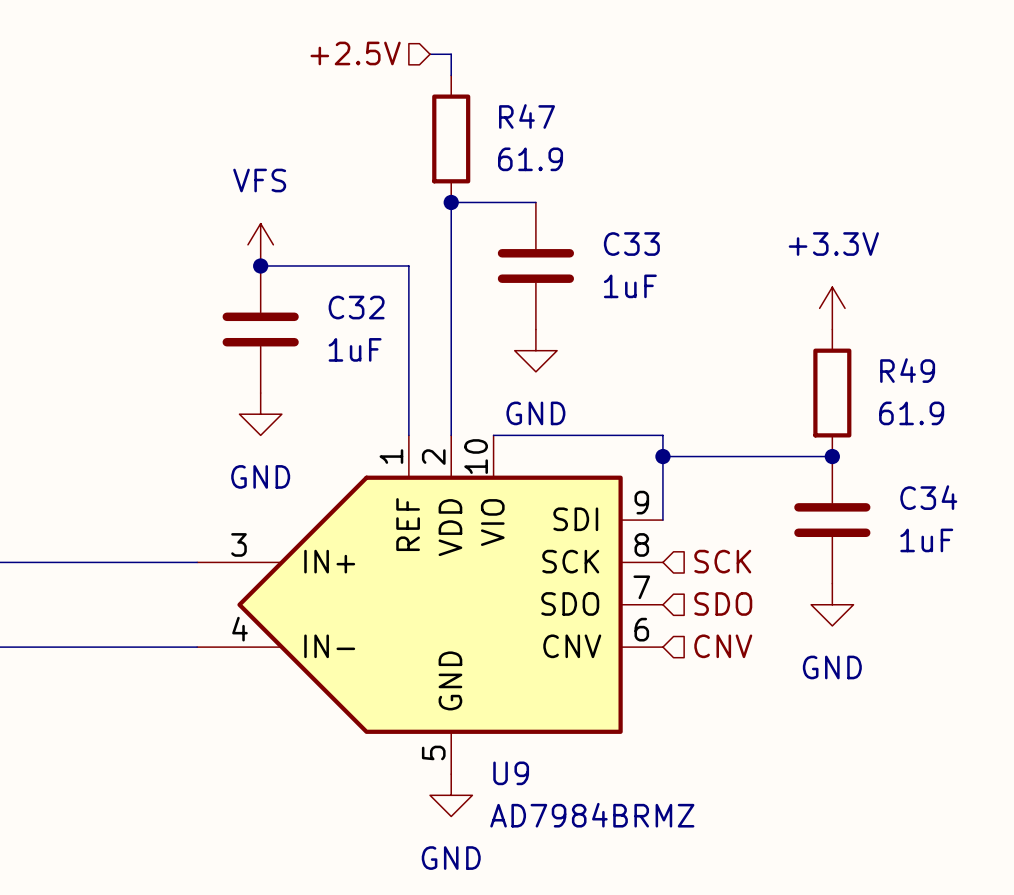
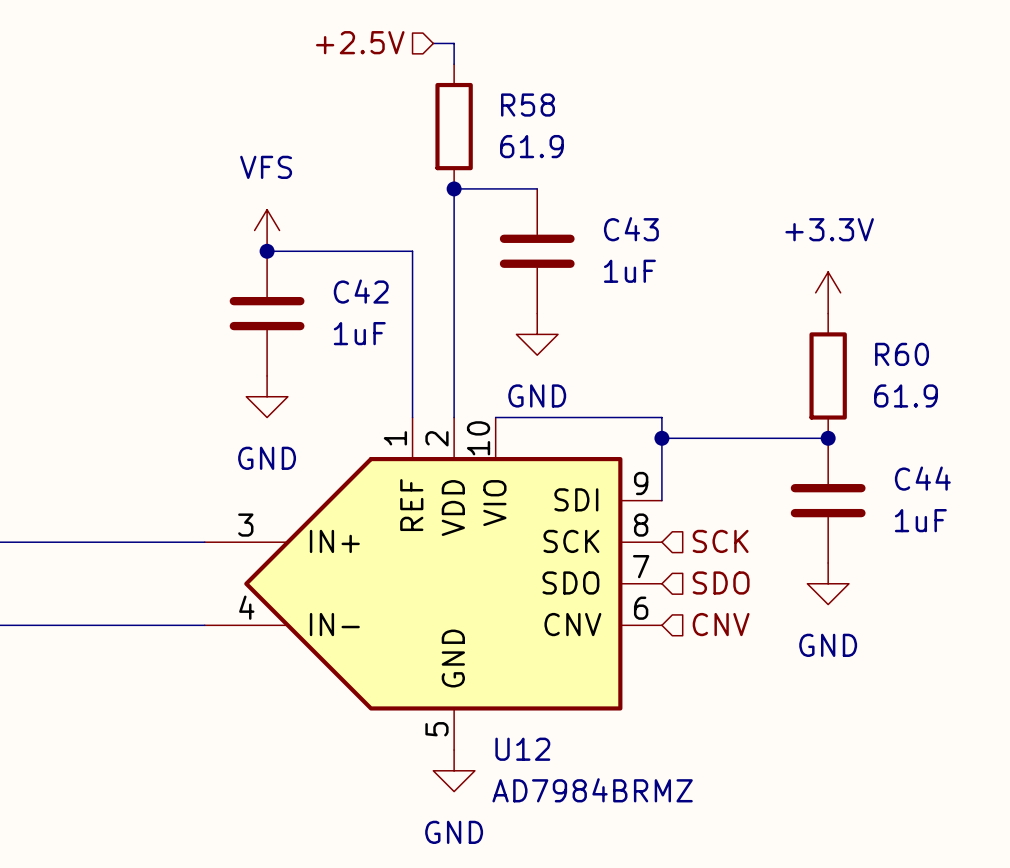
R47 name: R47 (527, 116) -> R58 (527, 105)
C33 name: C33 (631, 244) -> C43 (631, 229)
C32 name: C32 (356, 307) -> C42 (361, 291)
R49 name: R49 (907, 370) -> R60 (902, 354)
C34 name: C34 (928, 497) -> C44 (922, 478)
U9 name: U9 (511, 773) -> U12 (522, 749)

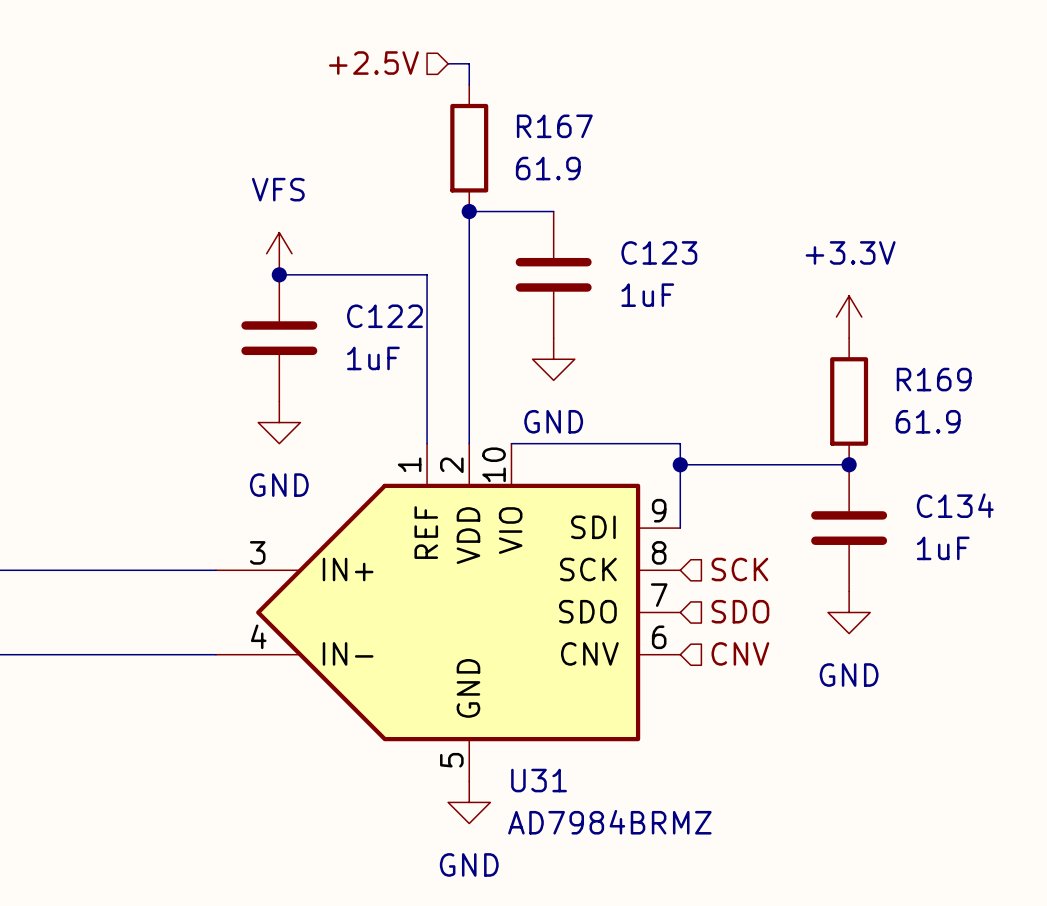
R58 name: R58 (527, 105) -> R167 (554, 126)
C43 name: C43 (631, 229) -> C123 (659, 252)
C42 name: C42 (361, 291) -> C122 (385, 316)
R60 name: R60 (902, 354) -> R169 (934, 379)
C44 name: C44 (922, 478) -> C134 (955, 505)
U12 name: U12 (522, 749) -> U31 (539, 780)

